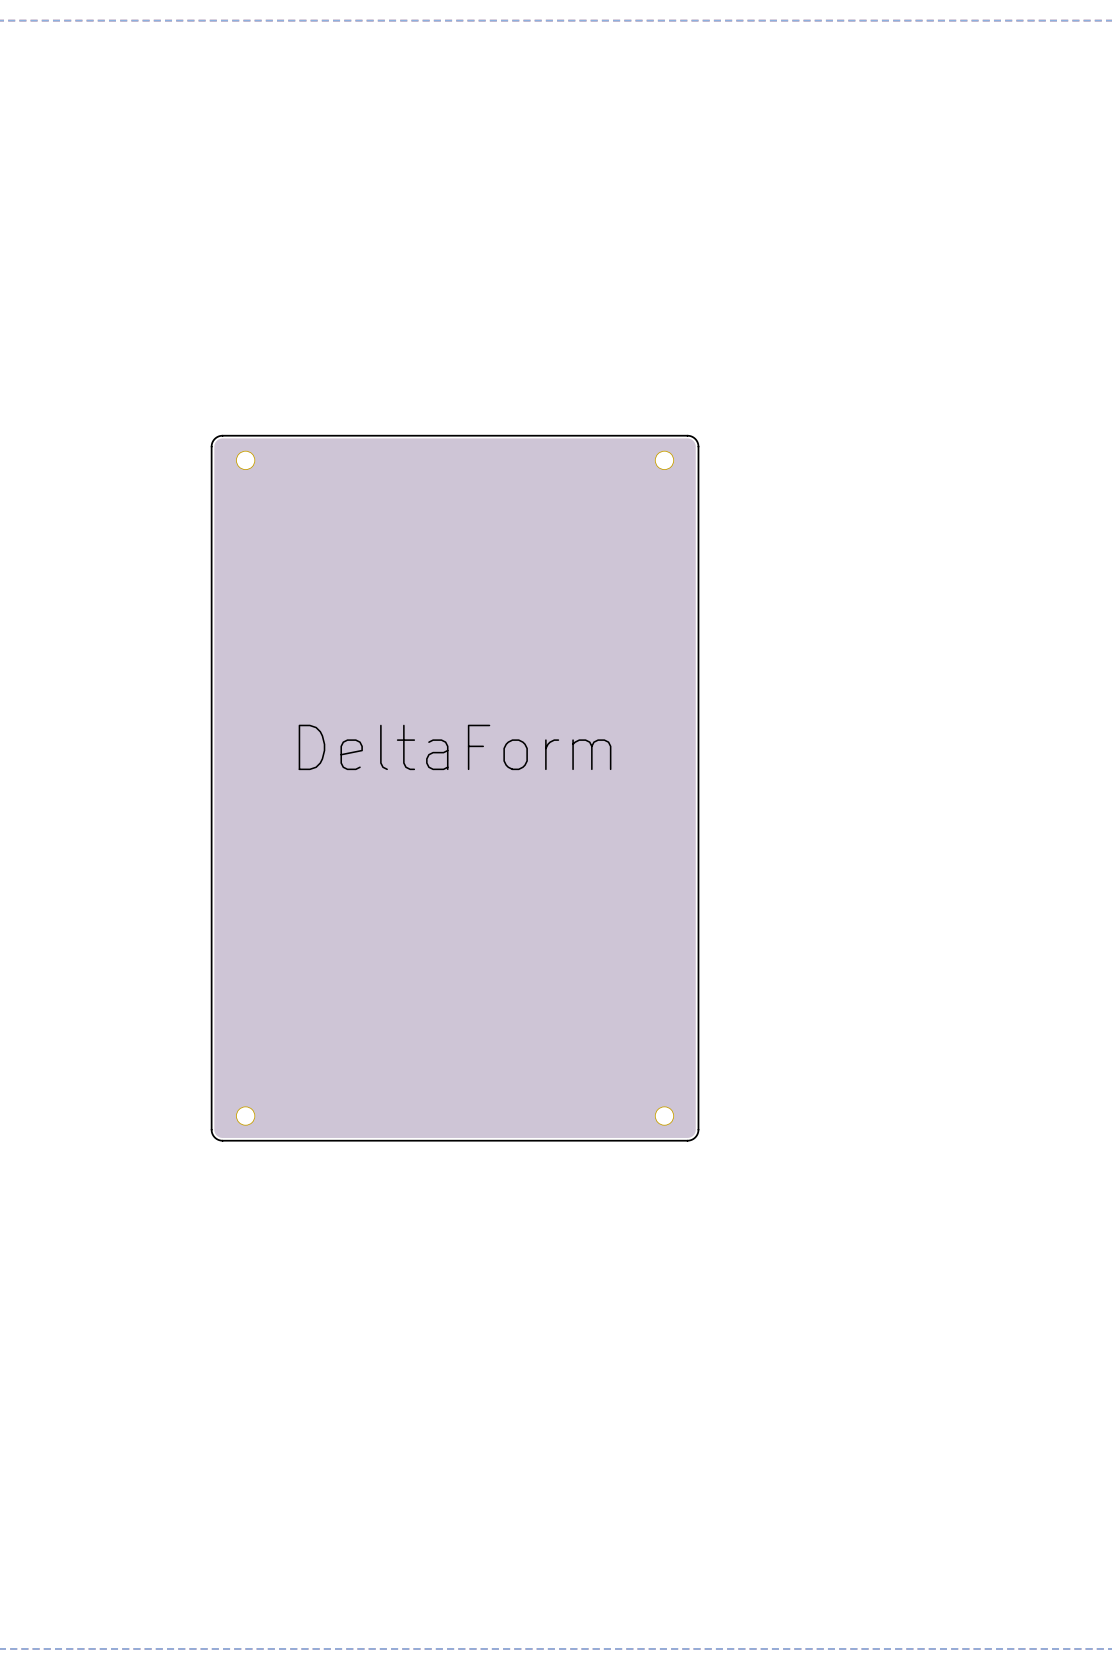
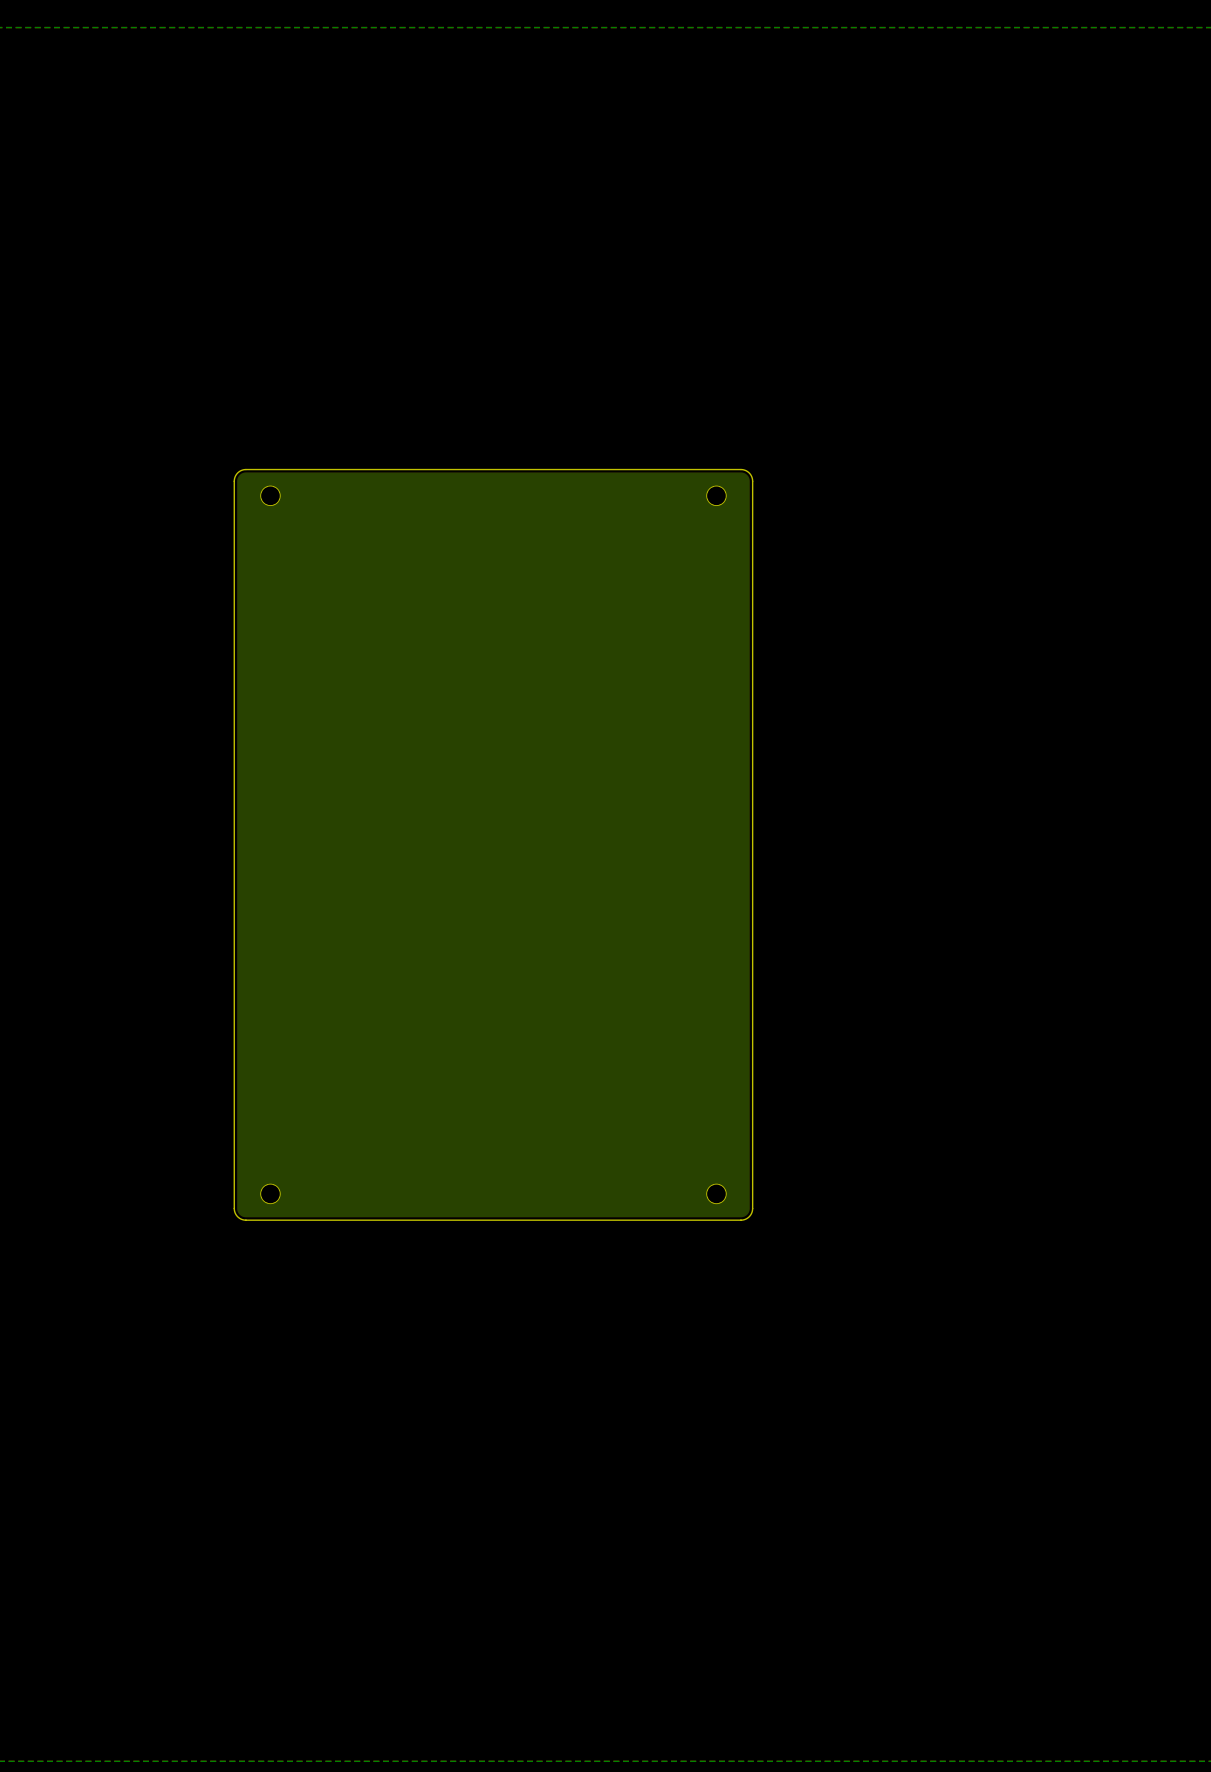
text: DeltaForm (455, 747) -> none

